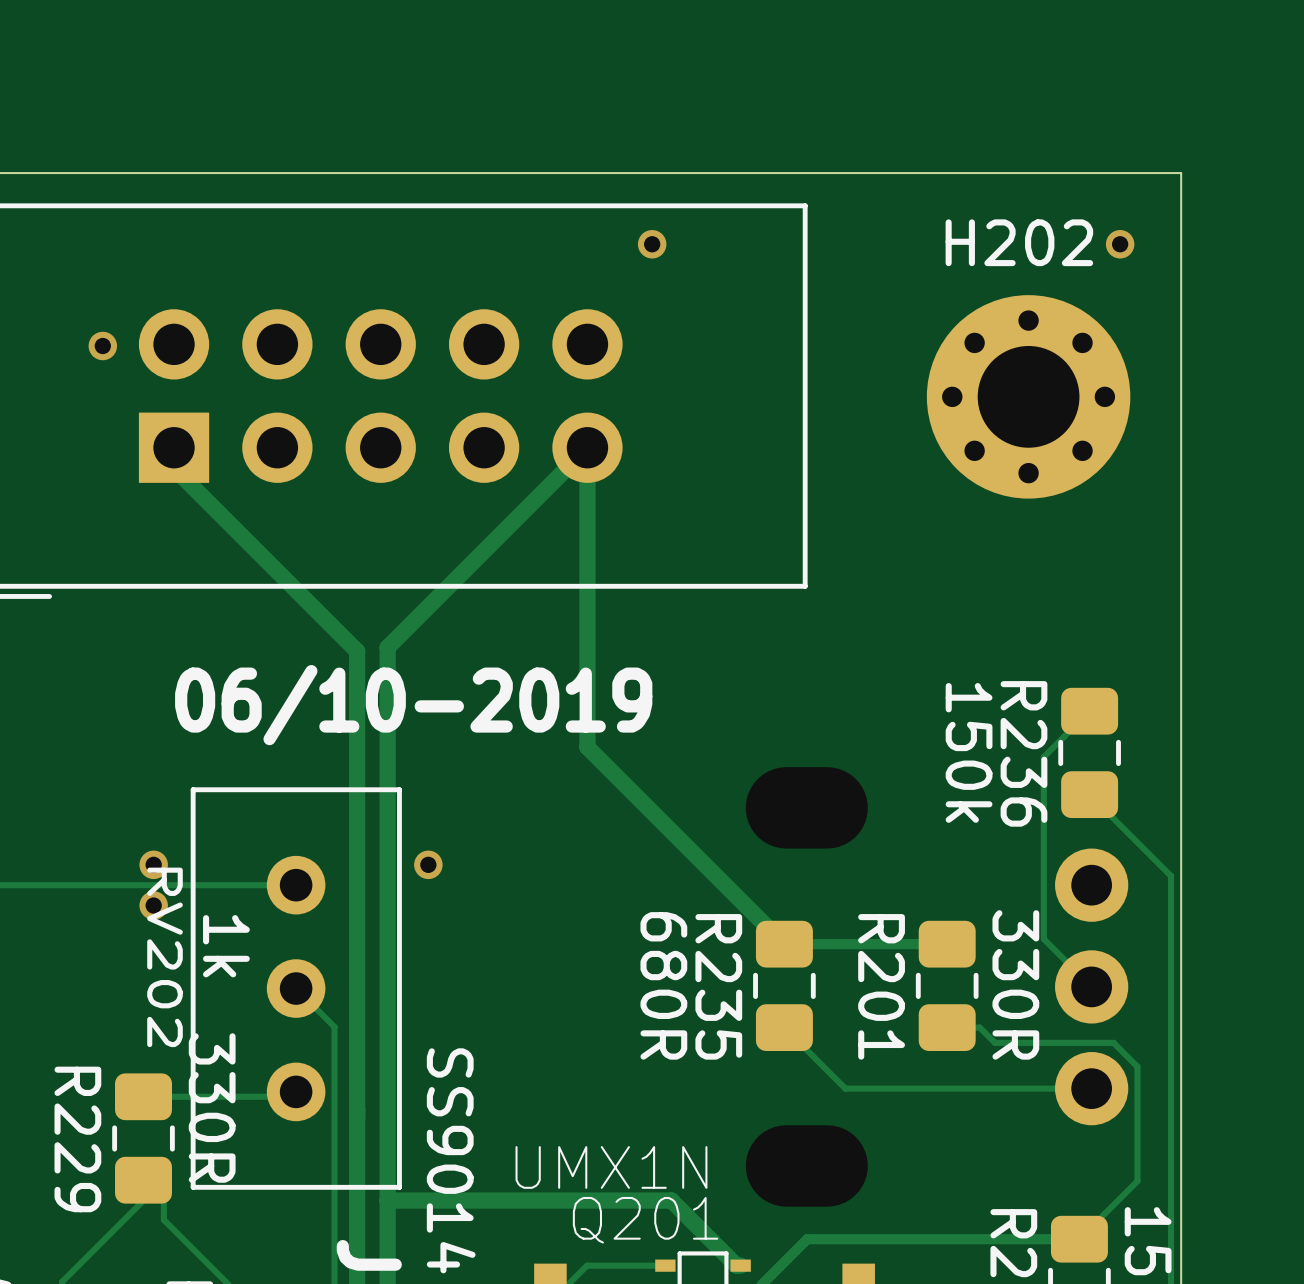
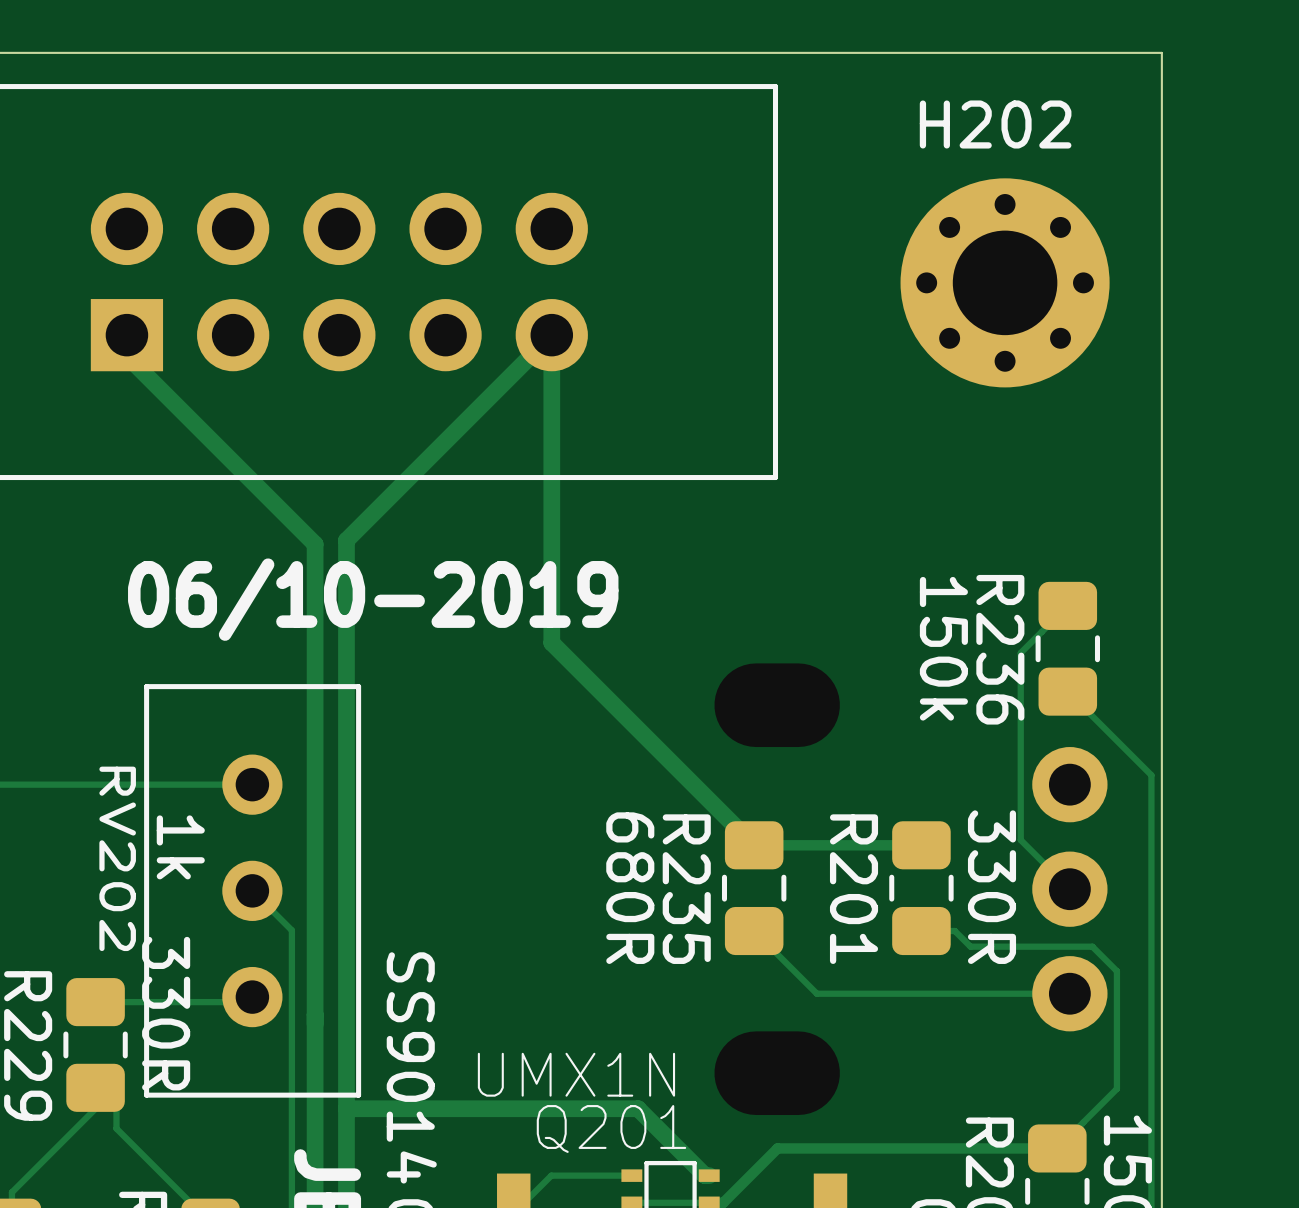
via: (652, 244) -> none
via: (1120, 244) -> none
via: (102, 346) -> none
via: (153, 864) -> none
via: (428, 864) -> none
via: (153, 905) -> none

